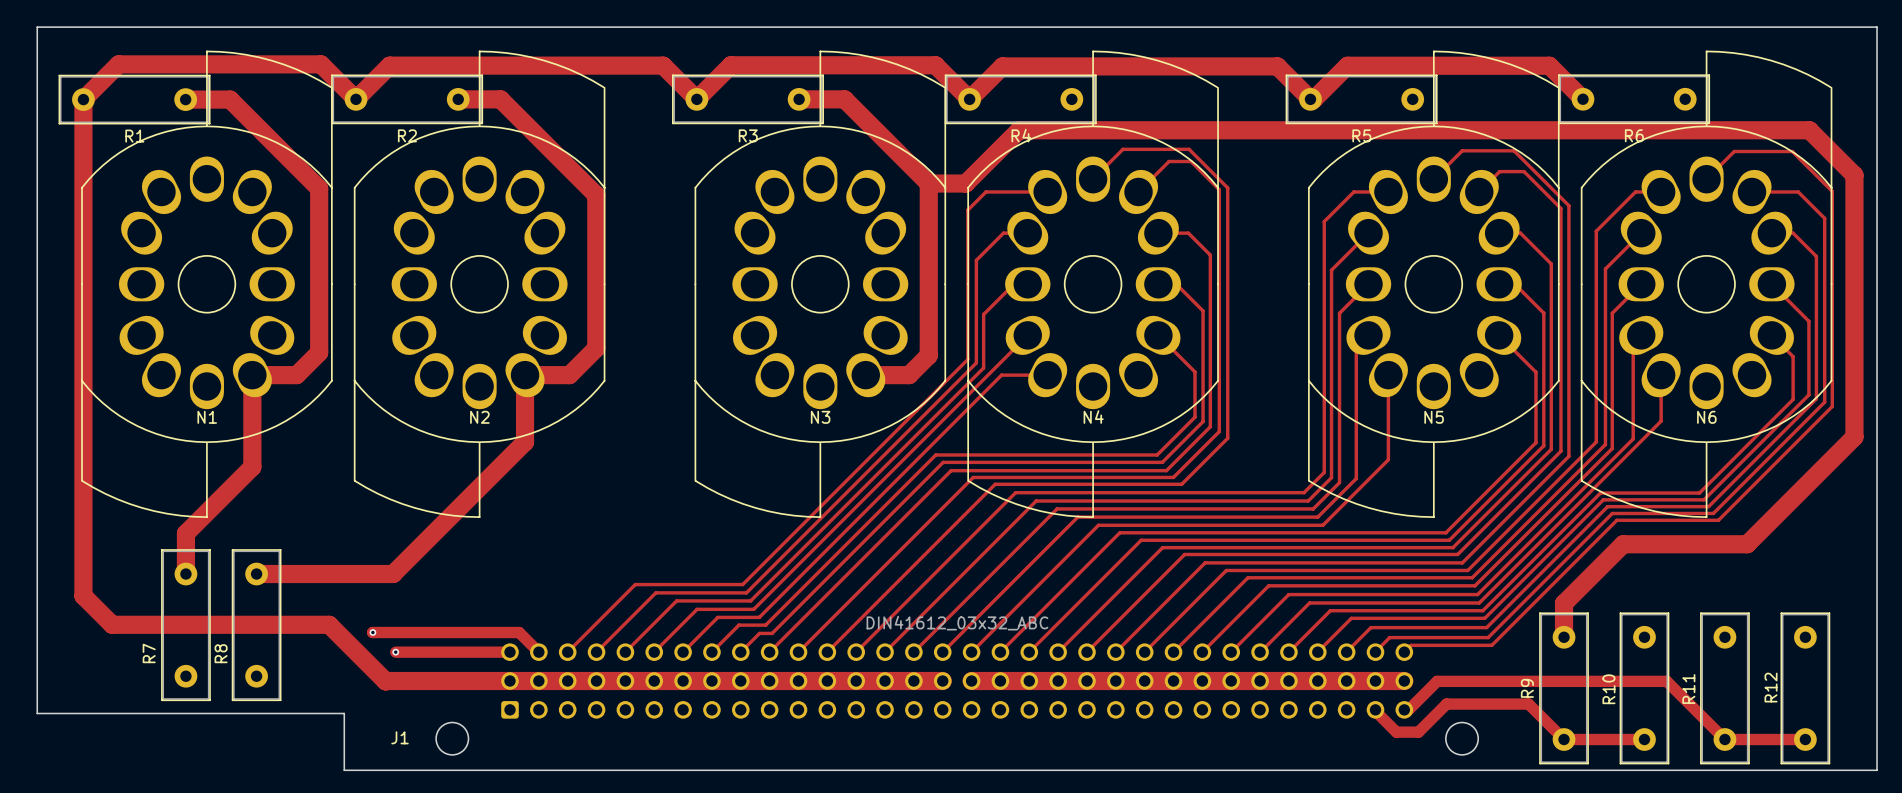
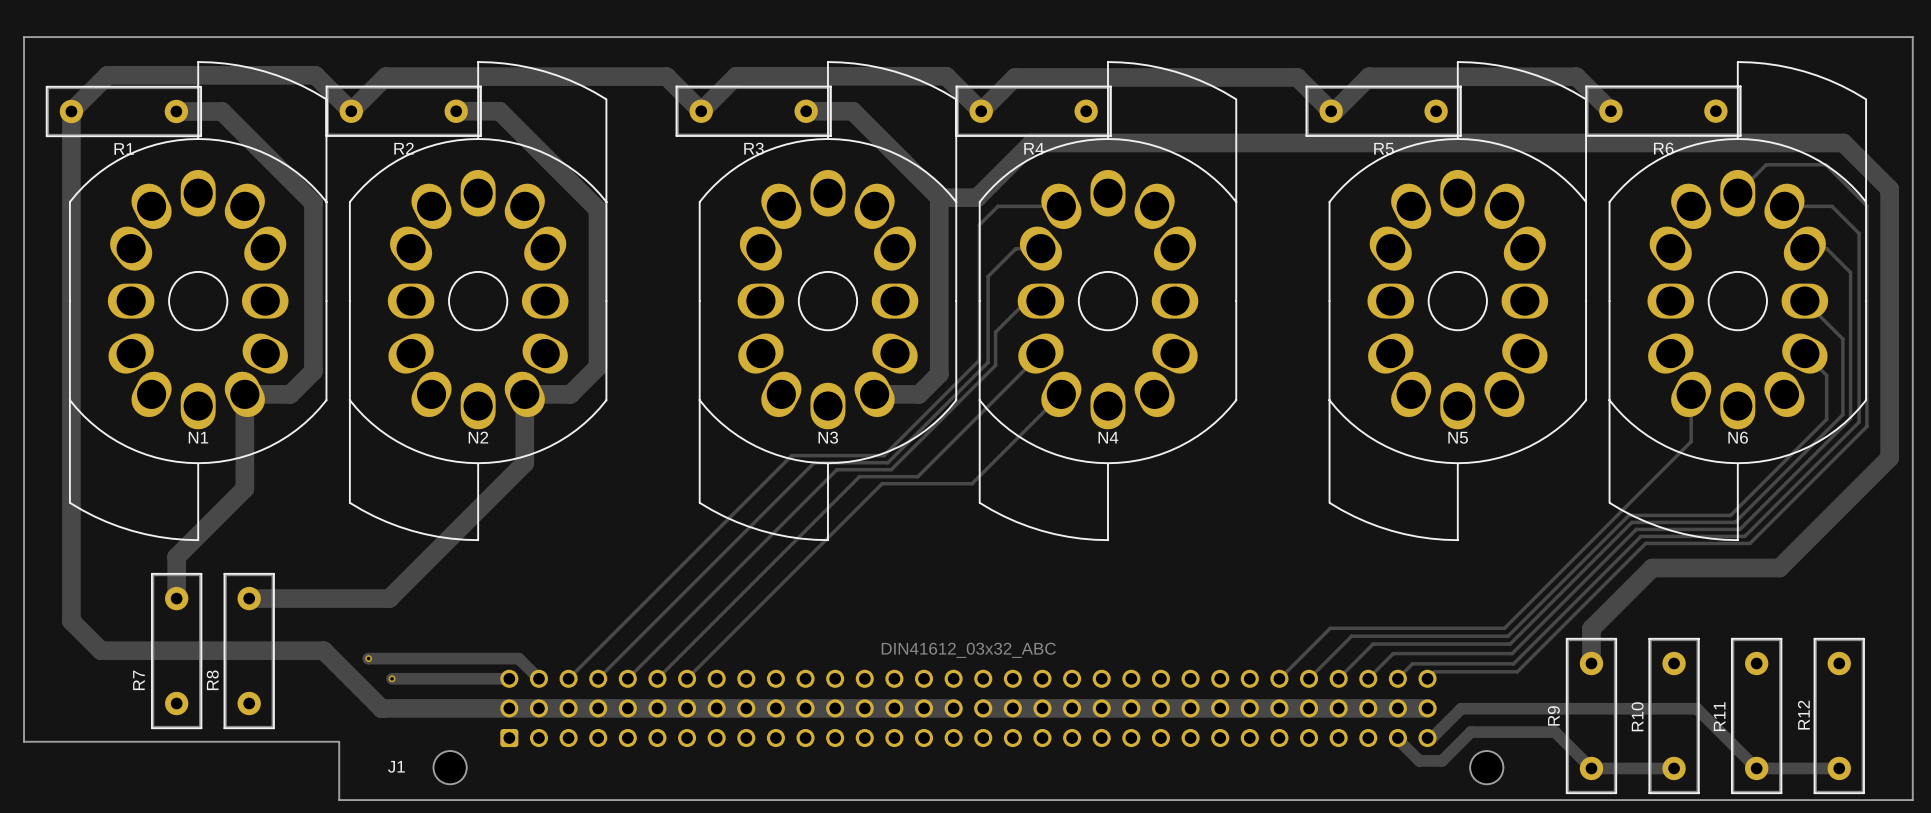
track: (1093, 179) (1122, 149) (1189, 149) (1227, 187) (1227, 438) (1181, 484) (995, 484) (827, 652) -> none
track: (1433, 179) (1462, 150) (1514, 150) (1568, 205) (1568, 456) (1462, 562) (1205, 562) (1115, 652) -> none
track: (1138, 191) (1169, 161) (1191, 161) (1219, 189) (1219, 431) (1173, 477) (973, 477) (798, 652) -> none
track: (1388, 191) (1353, 191) (1324, 221) (1324, 472) (1304, 492) (1015, 492) (856, 652) -> none
track: (1479, 191) (1499, 171) (1524, 171) (1560, 208) (1560, 451) (1457, 554) (1184, 554) (1086, 652) -> none
track: (1661, 191) (1635, 191) (1596, 231) (1596, 442) (1467, 570) (1226, 570) (1144, 652) -> none
track: (1158, 233) (1188, 233) (1210, 255) (1210, 426) (1166, 470) (951, 470) (769, 652) -> none
track: (1368, 233) (1331, 270) (1331, 477) (1308, 500) (1036, 500) (885, 652) -> none
track: (1499, 233) (1520, 233) (1551, 263) (1551, 449) (1452, 547) (1162, 547) (1058, 652) -> none
track: (1641, 233) (1605, 268) (1605, 444) (1472, 577) (1247, 577) (1173, 652) -> none
track: (1158, 284) (1176, 284) (1203, 310) (1203, 421) (1162, 462) (943, 462) (772, 633) (759, 633) (740, 652) -> none
track: (1368, 284) (1339, 313) (1339, 482) (1313, 508) (1057, 508) (913, 652) -> none
track: (1499, 284) (1514, 284) (1543, 313) (1543, 445) (1449, 540) (1141, 540) (1029, 652) -> none
track: (1641, 284) (1612, 313) (1612, 448) (1474, 585) (1268, 585) (1202, 652) -> none
track: (1158, 335) (1195, 371) (1195, 417) (1157, 454) (935, 454) (765, 625) (738, 625) (711, 652) -> none
track: (1368, 335) (1356, 347) (1356, 478) (1317, 517) (1077, 517) (942, 652) -> none
track: (1499, 335) (1535, 372) (1535, 442) (1445, 532) (1119, 532) (1000, 652) -> none
track: (1641, 335) (1633, 343) (1633, 438) (1477, 594) (1288, 594) (1231, 652) -> none
track: (967, 341) (967, 359) (742, 584) (635, 584) -> (979, 360) (884, 455) (791, 455) (637, 609)
track: (976, 344) (976, 362) (746, 592) (655, 592) -> (988, 362) (887, 462) (814, 462) (659, 617)
track: (983, 346) (983, 367) (750, 600) (676, 600) -> (995, 365) (891, 469) (836, 469) (680, 626)
track: (1047, 375) (1001, 375) (759, 617) (717, 617) -> (1061, 394) (972, 483) (882, 483) (722, 643)
track: (1388, 375) (1388, 459) (1322, 525) (1098, 525) (971, 652) -> none
track: (907, 455) (753, 609) (697, 609) -> (917, 476) (859, 476) (701, 634)

